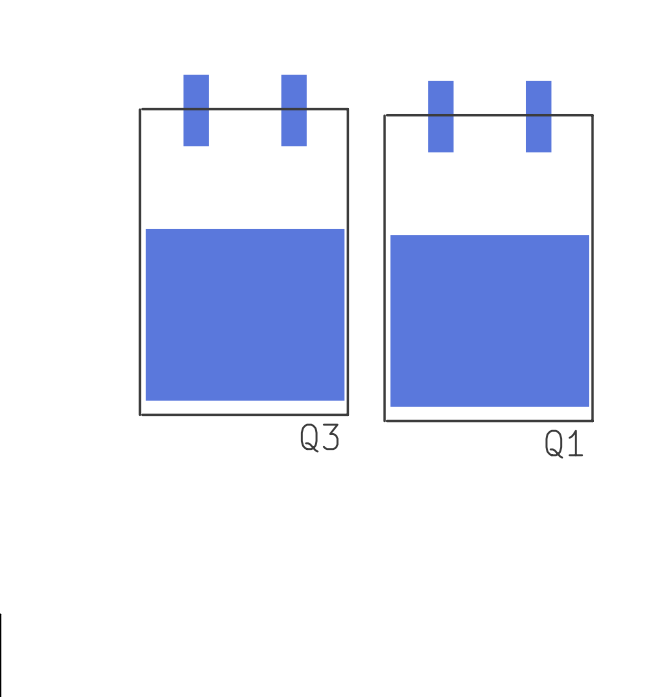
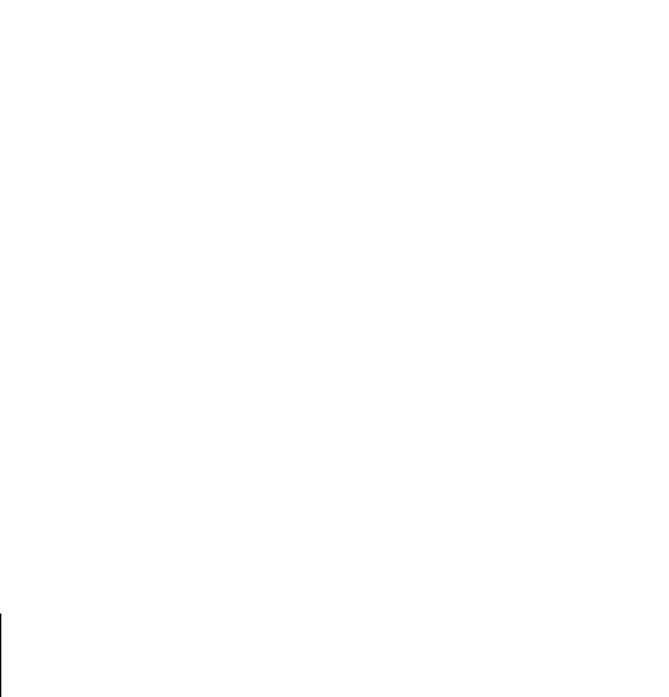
Q3: (243, 245) -> none
Q1: (488, 251) -> none

